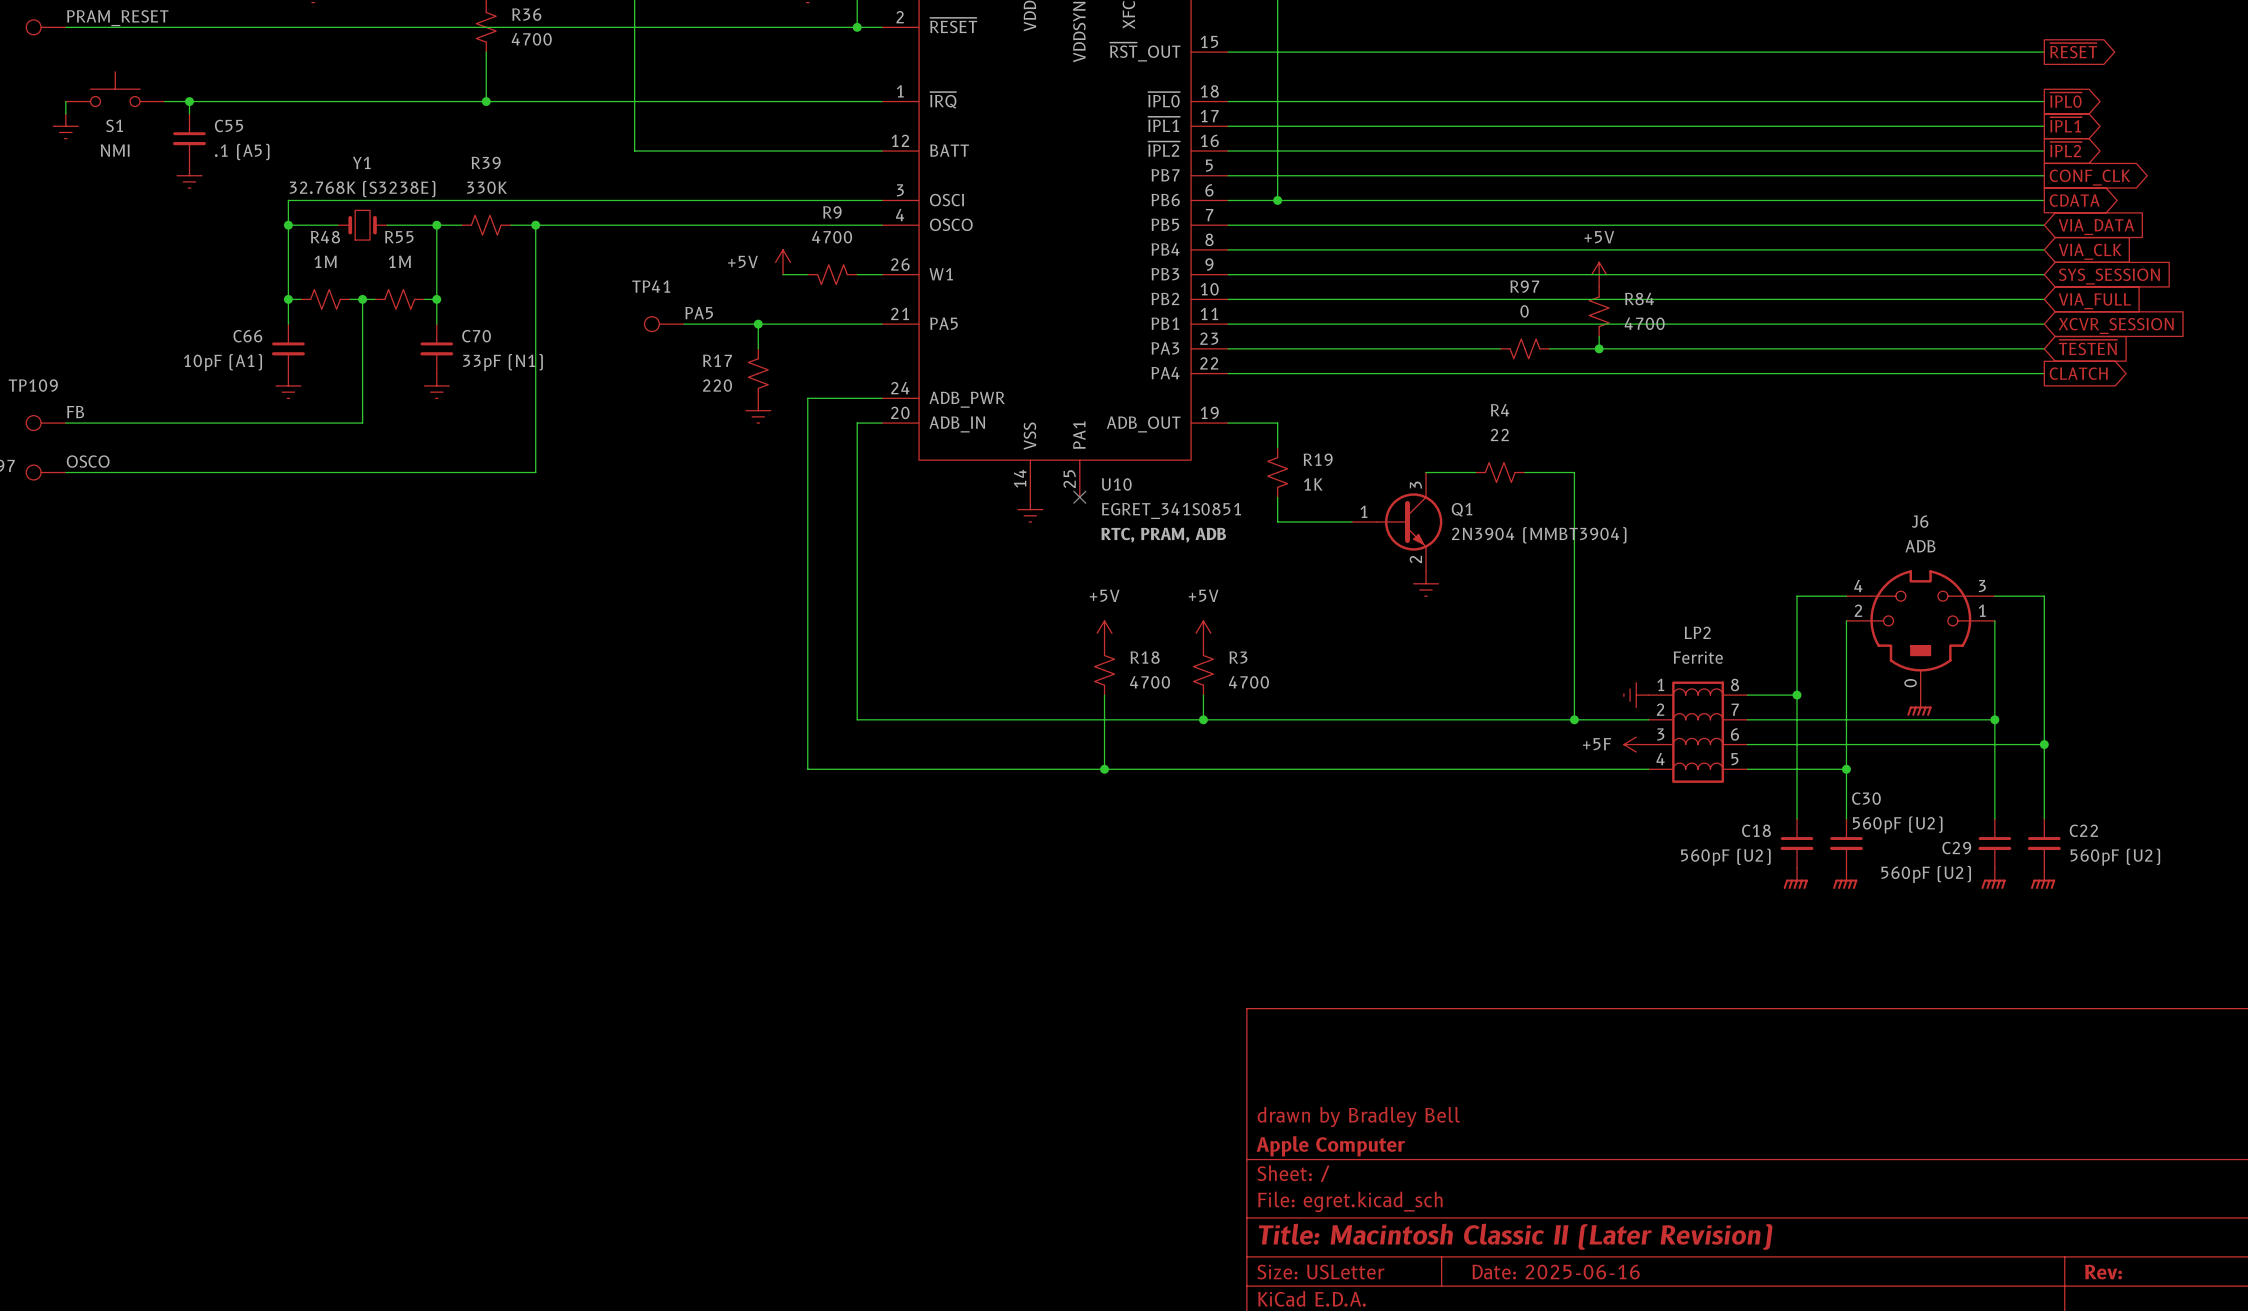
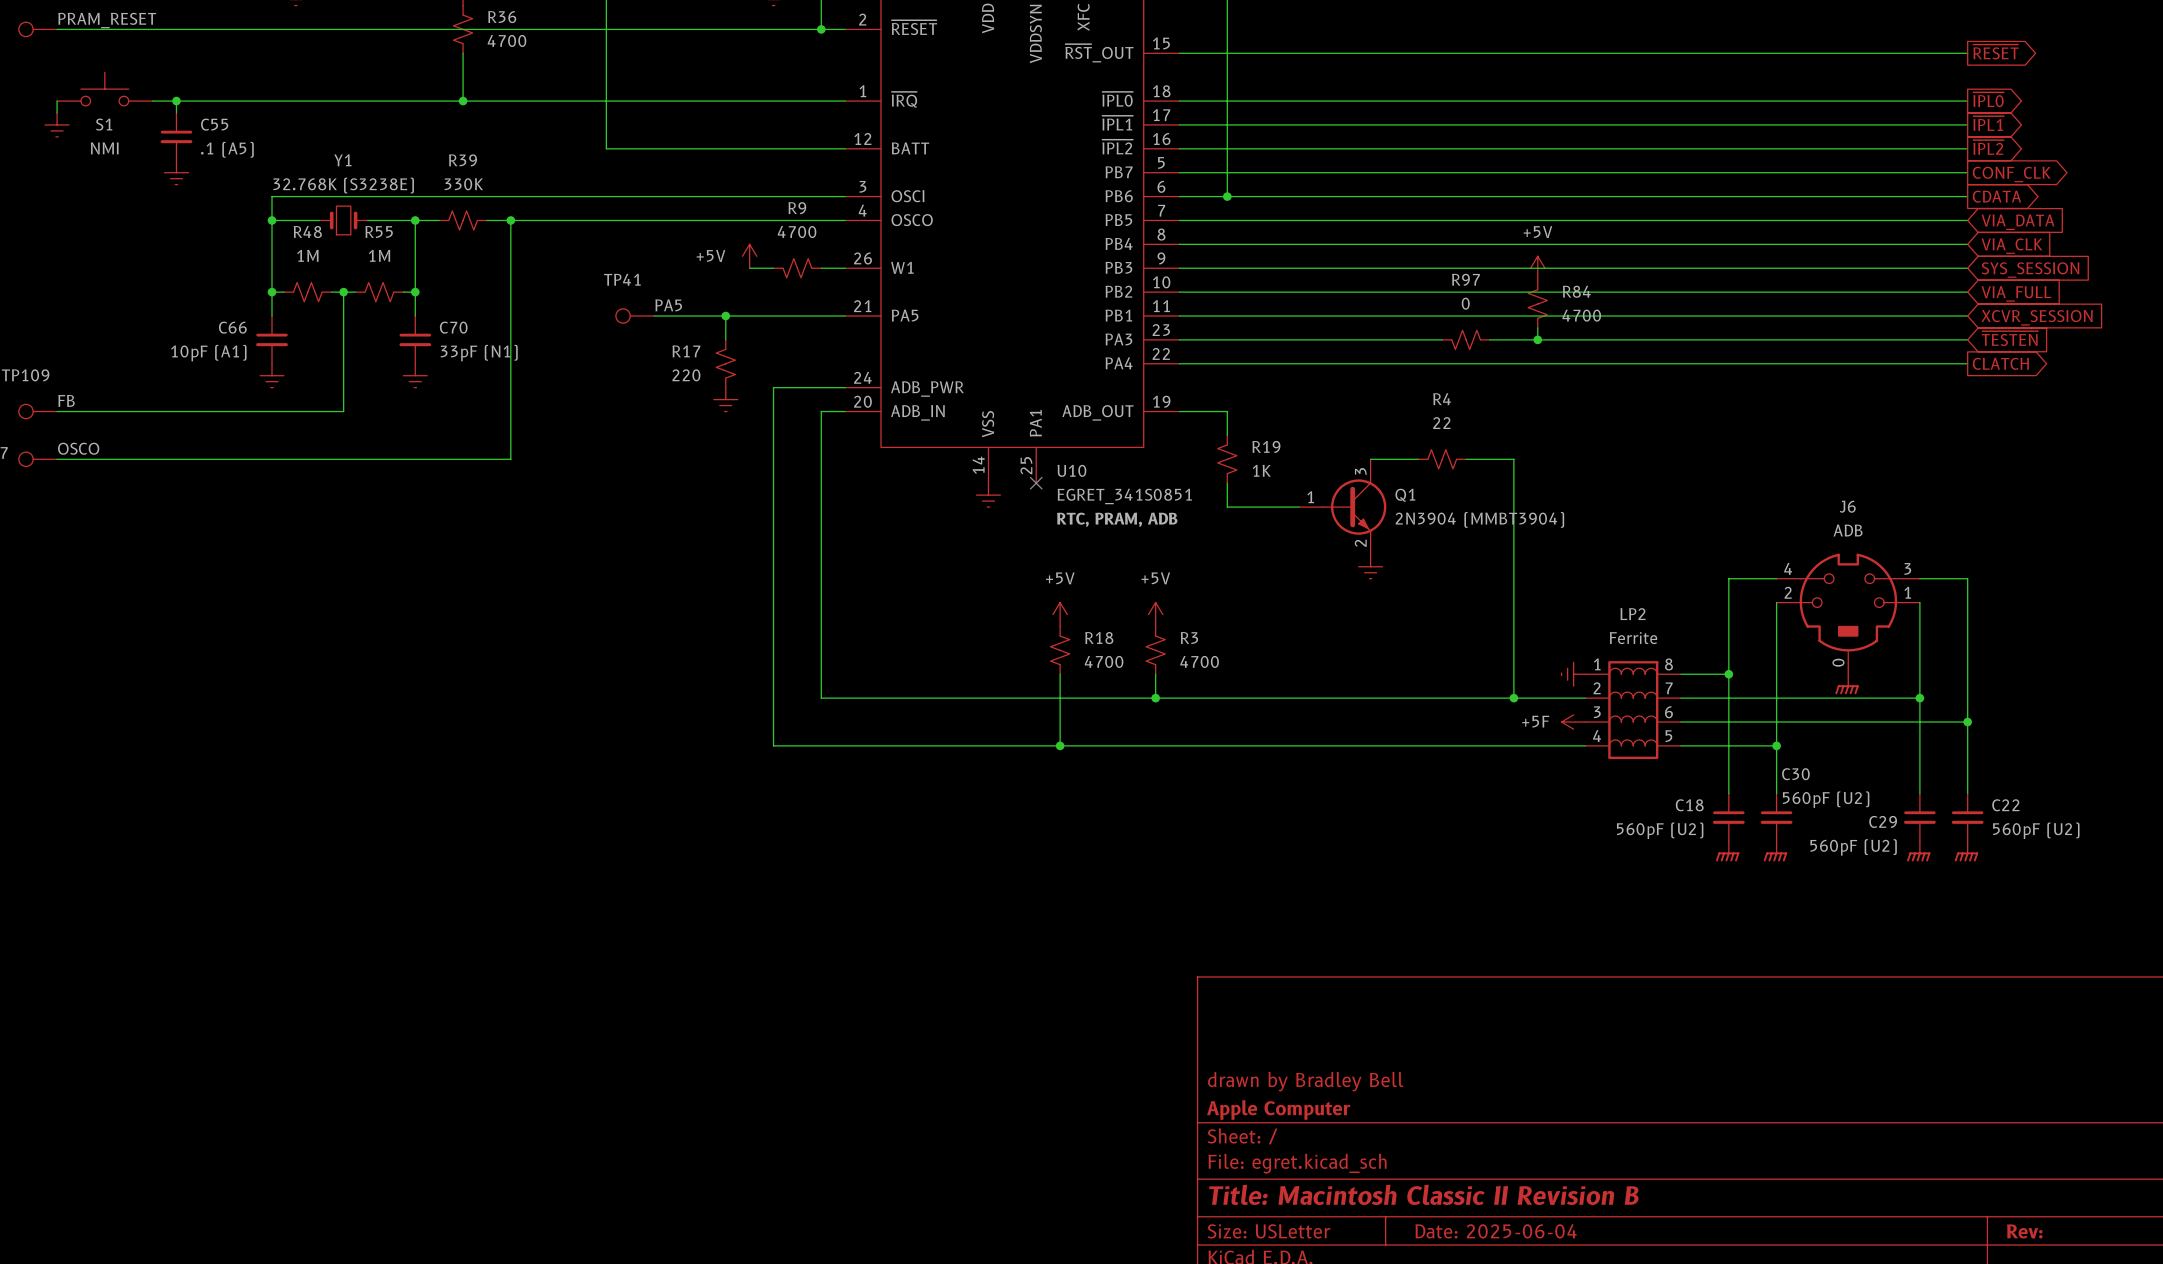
title block: Title: Macintosh Classic II (Later Revision) (1515, 1236) -> Title: Macintosh Classic II Revision B (1423, 1194)
title block: Date: 2025-06-16 (1556, 1272) -> Date: 2025-06-04 (1496, 1231)

